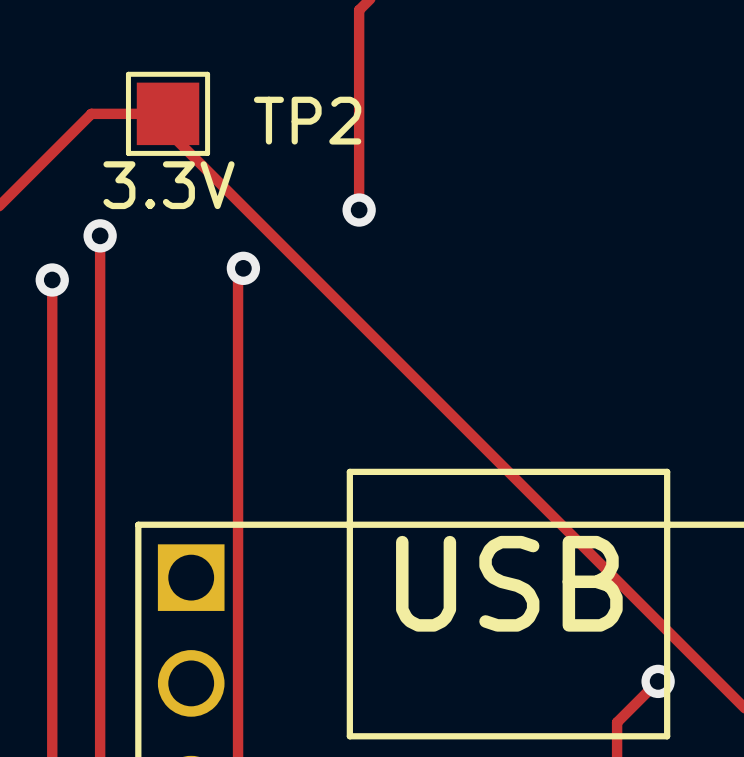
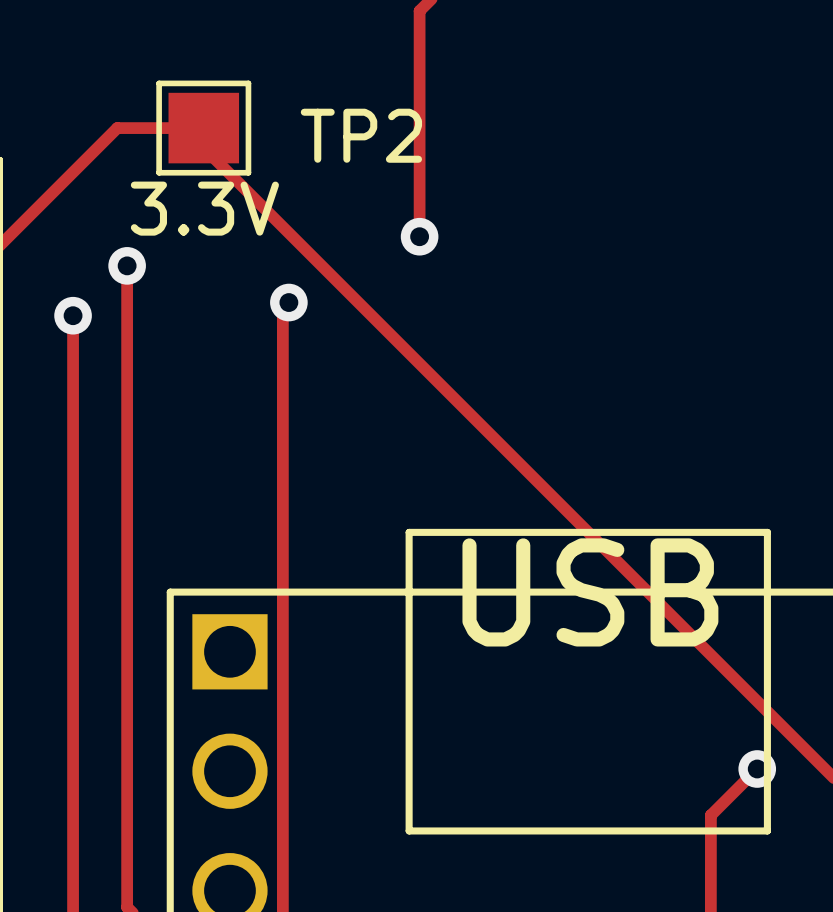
text position: USB (509, 583) -> USB (590, 592)

